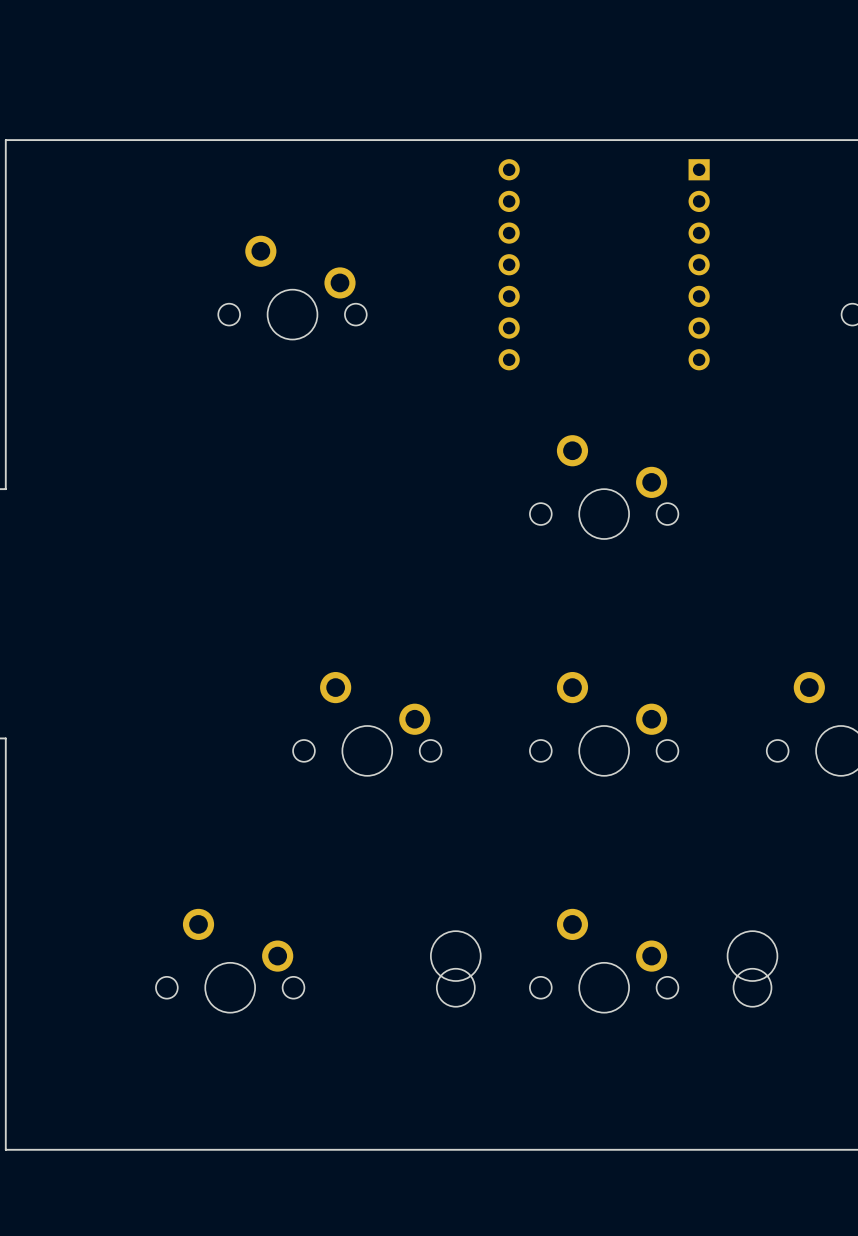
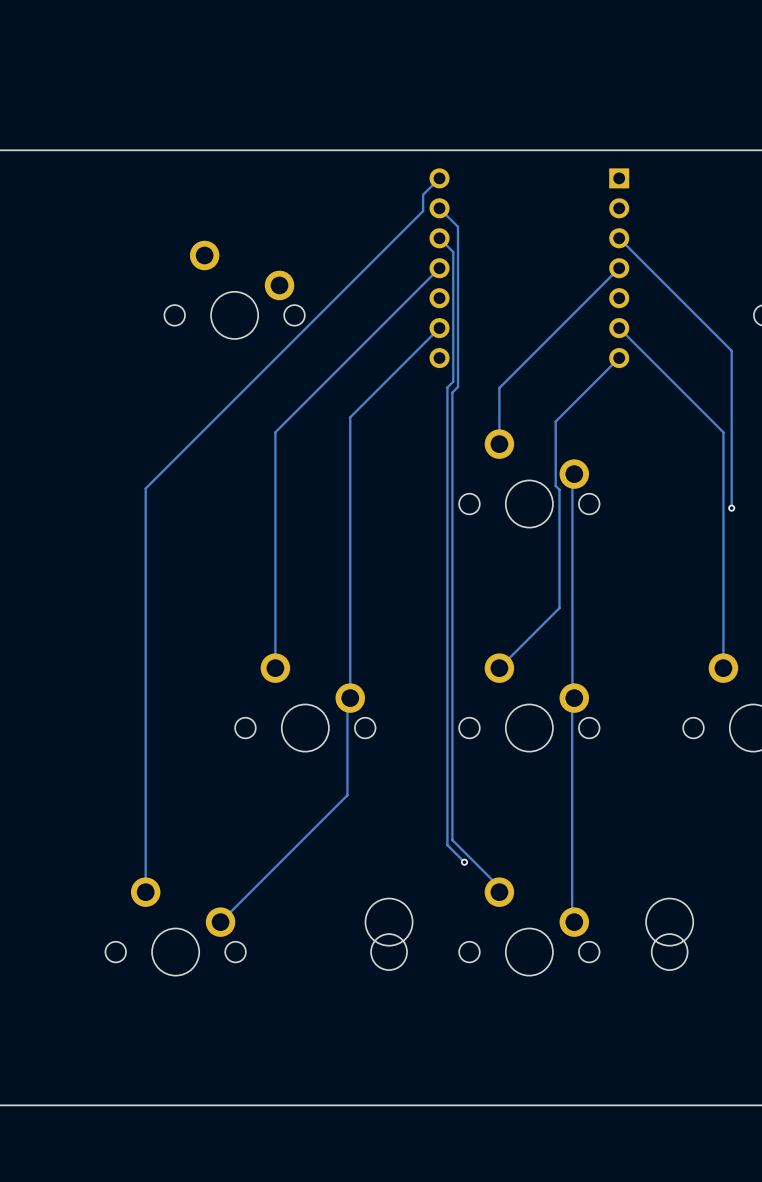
track: none -> (439, 178) (423, 194) (423, 211) (145, 488) (145, 892)
track: none -> (439, 208) (458, 226) (458, 386) (452, 392) (452, 840) (499, 887) (499, 892)
track: none -> (439, 238) (453, 252) (453, 381) (447, 387) (447, 845) (464, 862)
track: none -> (619, 238) (731, 350) (731, 508)
track: none -> (439, 268) (275, 432) (275, 668)
track: none -> (619, 268) (499, 388) (499, 444)
track: none -> (439, 328) (350, 417) (350, 698) (347, 700) (347, 795) (220, 922)
track: none -> (619, 328) (723, 432) (723, 668)
track: none -> (619, 358) (555, 421) (555, 486) (559, 489) (559, 608) (499, 668)
track: none -> (574, 474) (572, 475) (572, 696) (574, 698) (572, 700) (572, 920) (574, 922)
via: none -> (731, 508)
via: none -> (464, 862)

